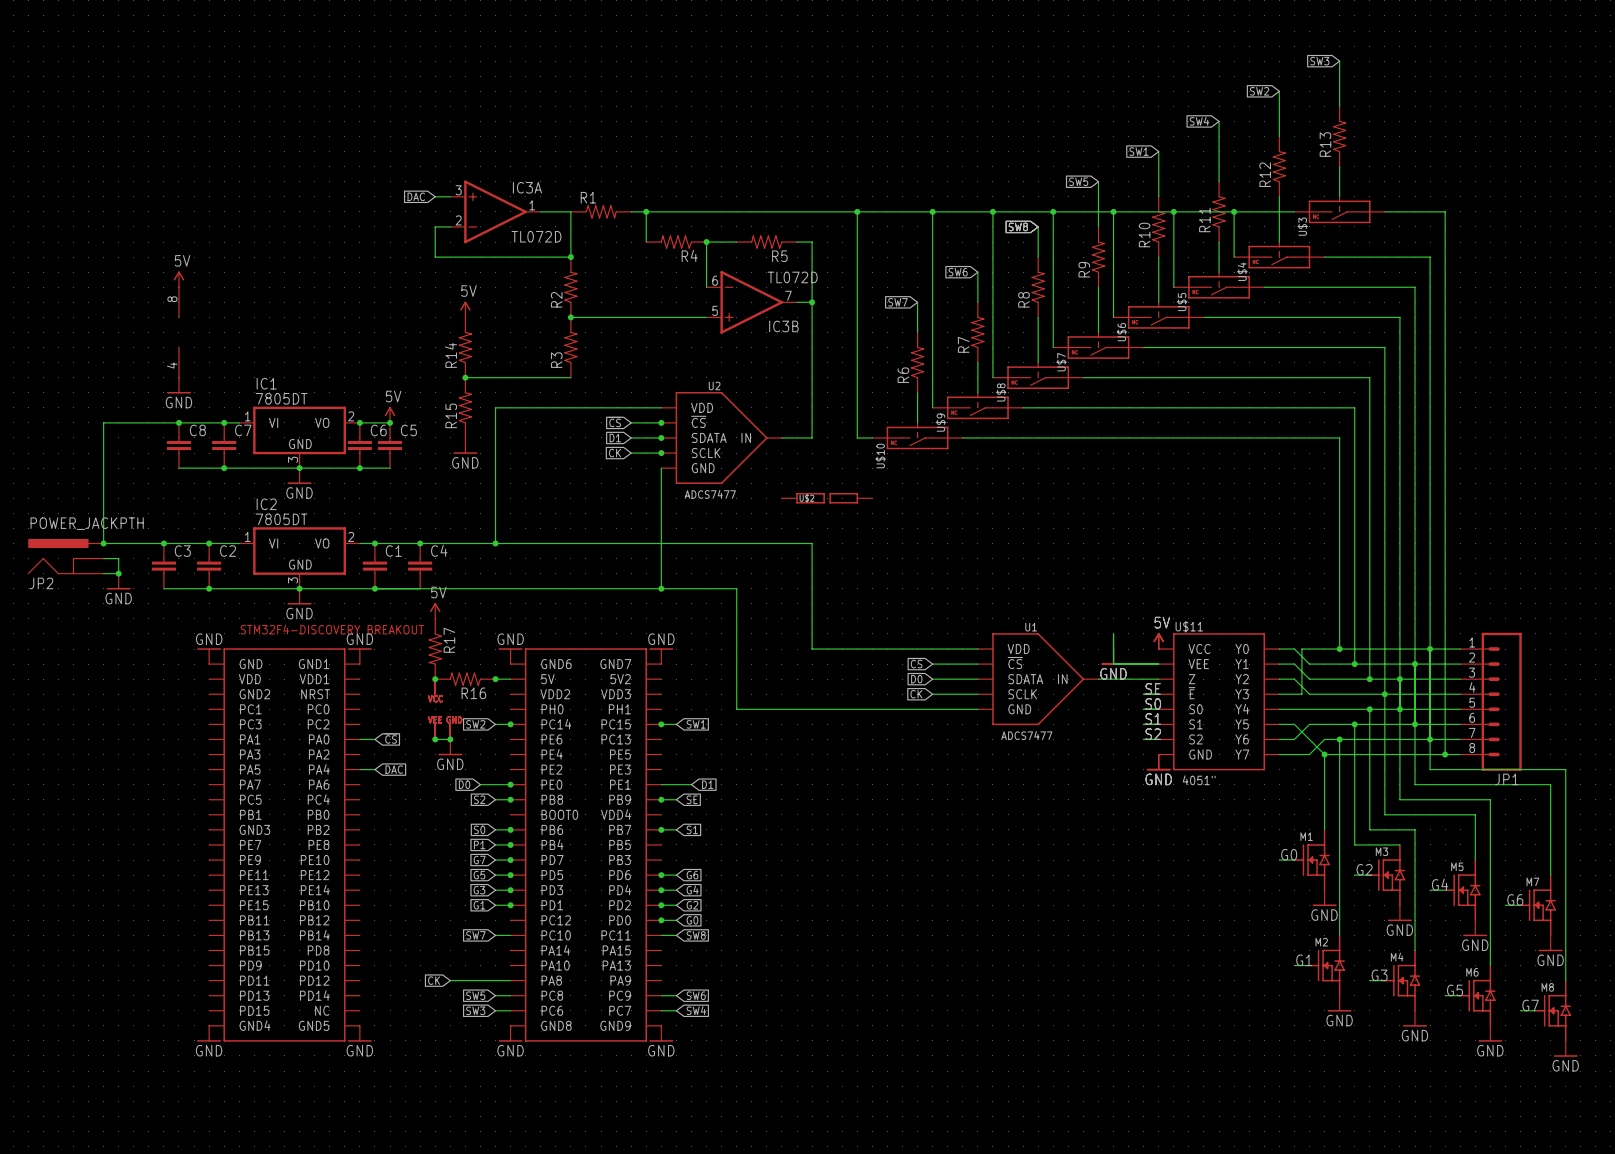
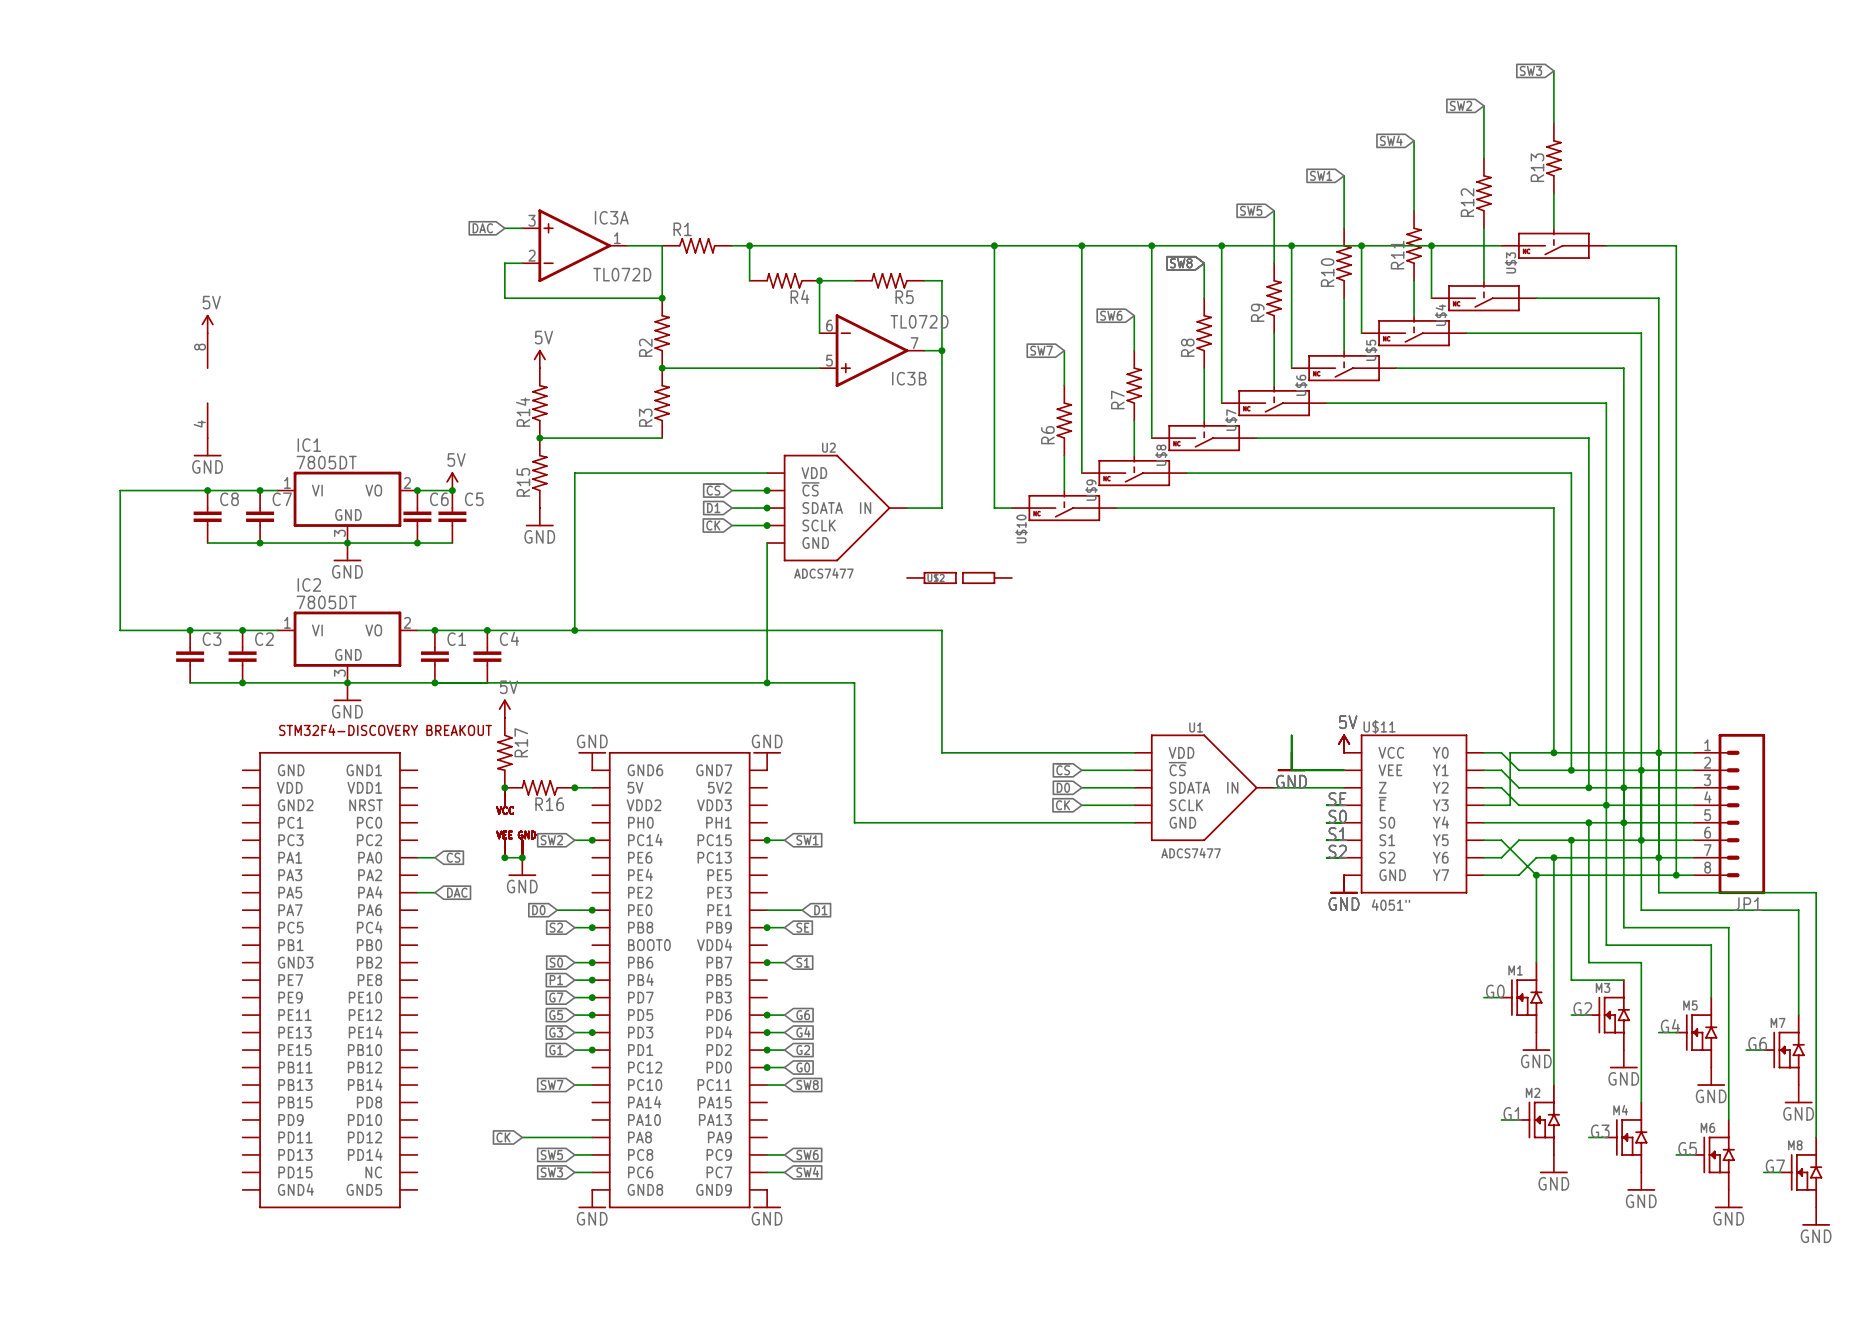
junction: (103, 543) -> none
JP2: POWER_JACKPTH (65, 556) -> none
wire: (103, 558) (118, 558) (118, 573) (103, 573) -> none
junction: (118, 573) -> none
power symbol: GND (118, 581) -> none
power symbol: GND (209, 656) -> none
power symbol: GND (359, 656) -> none
power symbol: GND (209, 1033) -> none
power symbol: GND (359, 1033) -> none

